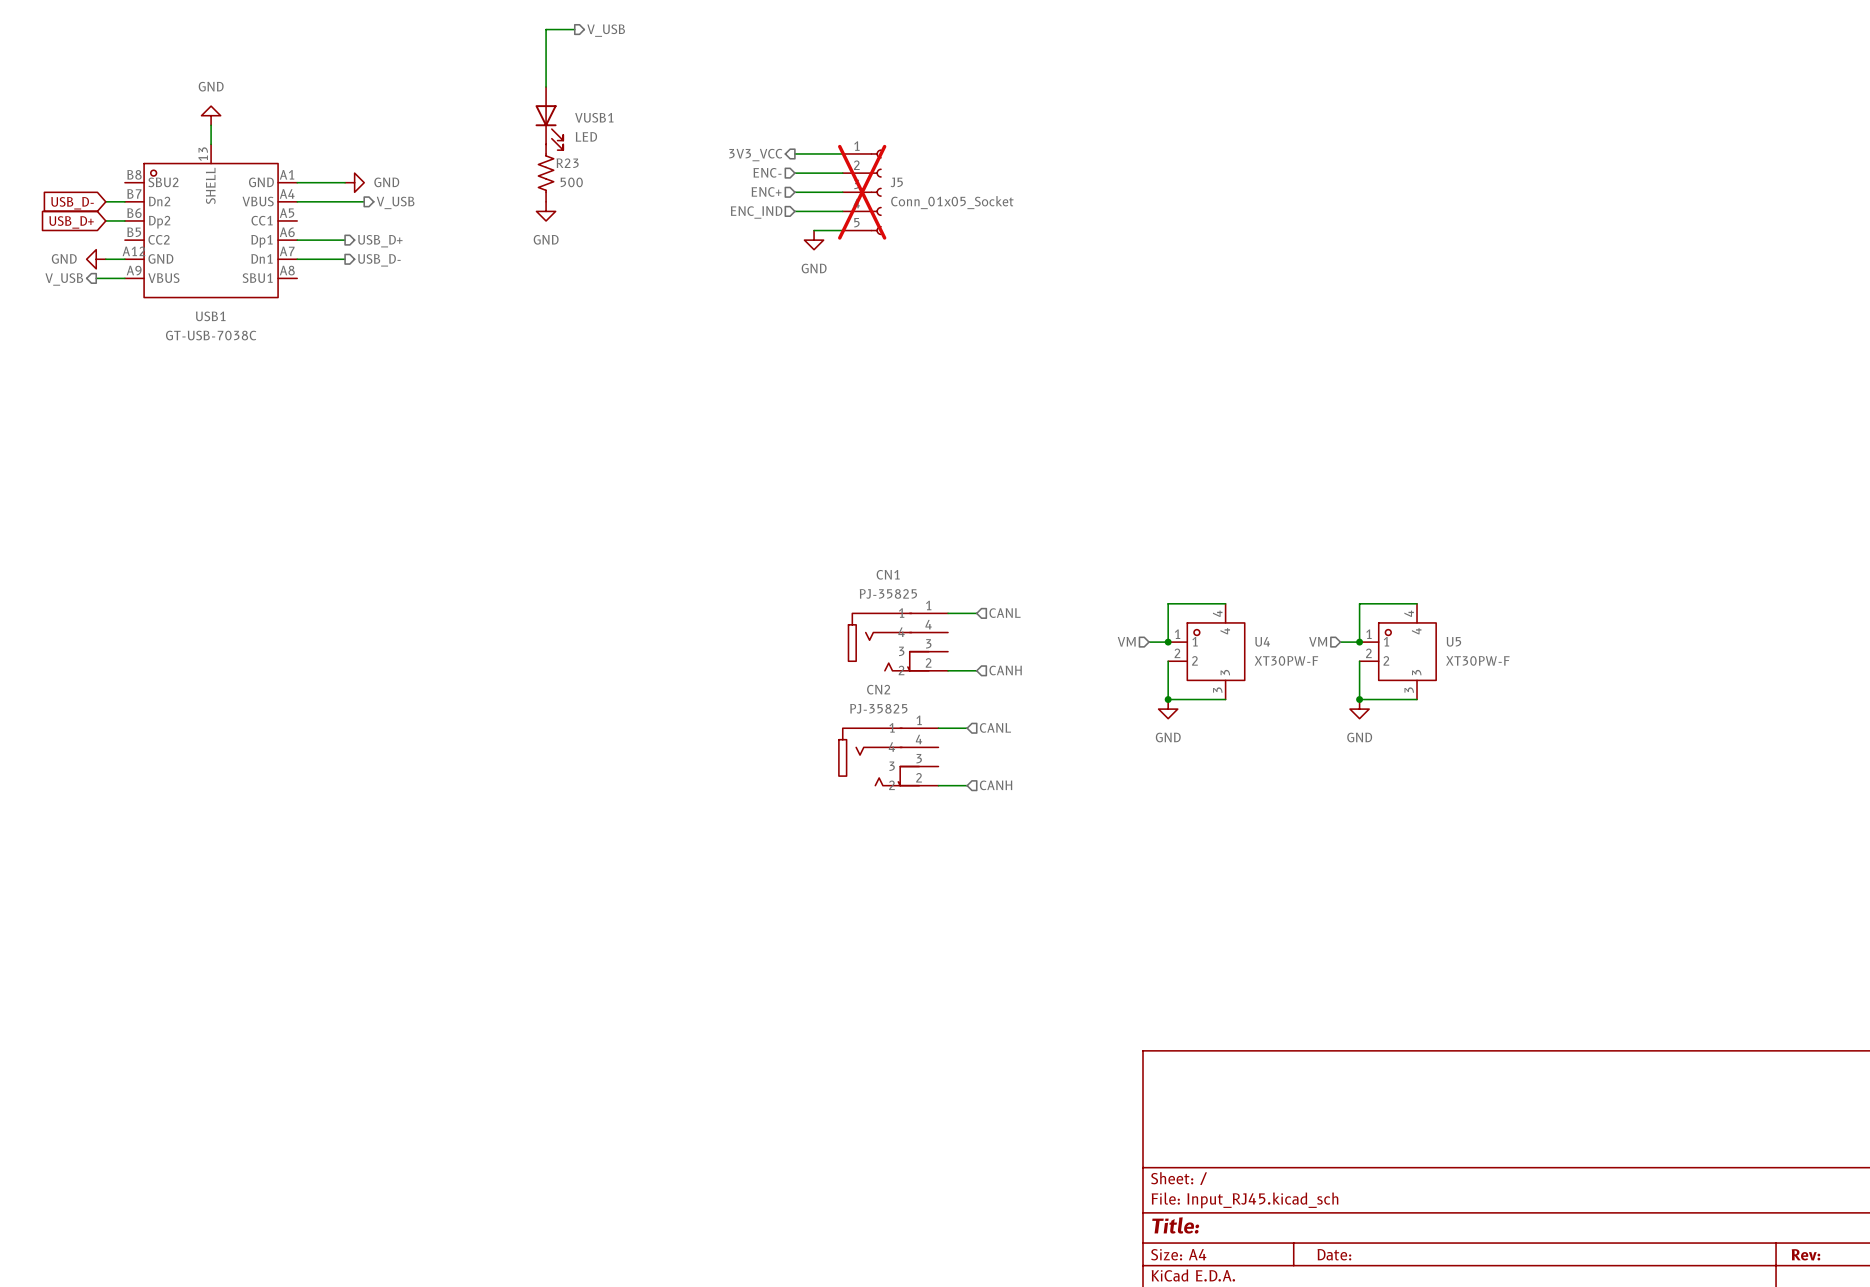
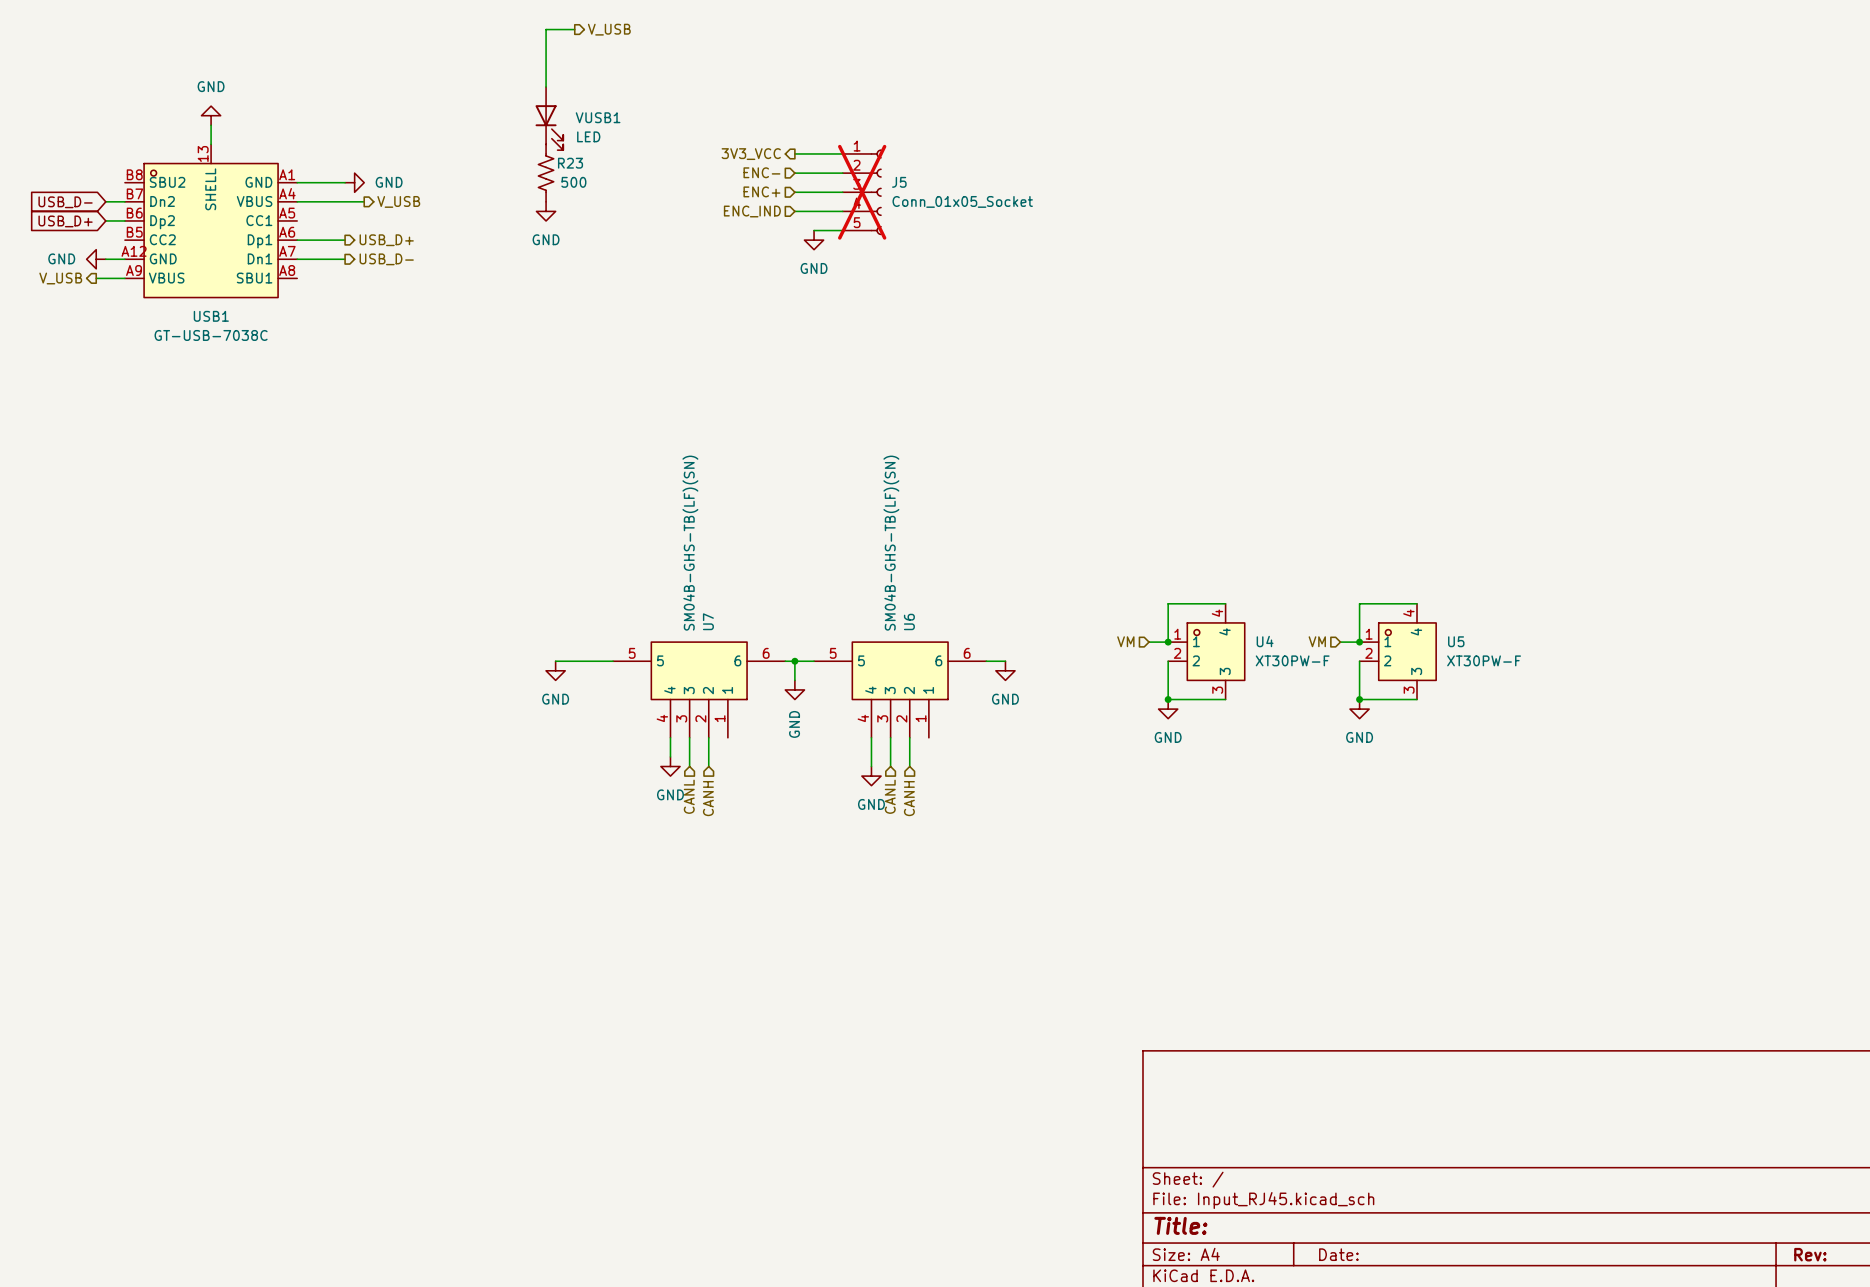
wire: (948, 613) (976, 613) -> none
hierarchical label: CANL (1005, 613) -> none
CN1: PJ-35825 (898, 642) -> none
wire: none -> (555, 661) (613, 661)
wire: none -> (794, 661) (794, 680)
junction: none -> (794, 661)
wire: none -> (986, 661) (1005, 661)
power symbol: none -> GND (555, 670)
wire: (948, 670) (976, 670) -> (785, 661) (814, 661)
hierarchical label: CANH (1005, 670) -> none
power symbol: none -> GND (1005, 670)
U7: none -> SM04B-GHS-TB(LF)(SN) (699, 689)
power symbol: none -> GND (794, 689)
U6: none -> SM04B-GHS-TB(LF)(SN) (900, 689)
hierarchical label: CANL (995, 727) -> none
wire: (938, 728) (967, 728) -> none
wire: none -> (670, 737) (670, 756)
wire: none -> (689, 737) (689, 766)
wire: none -> (708, 737) (708, 766)
wire: none -> (871, 737) (871, 766)
wire: none -> (890, 737) (890, 766)
wire: none -> (909, 737) (909, 766)
CN2: PJ-35825 (888, 756) -> none
power symbol: none -> GND (670, 766)
power symbol: none -> GND (871, 776)
wire: (938, 785) (967, 785) -> none
hierarchical label: CANH (996, 785) -> none
hierarchical label: none -> CANL (689, 796)
hierarchical label: none -> CANL (890, 796)
hierarchical label: none -> CANH (708, 798)
hierarchical label: none -> CANH (909, 798)

